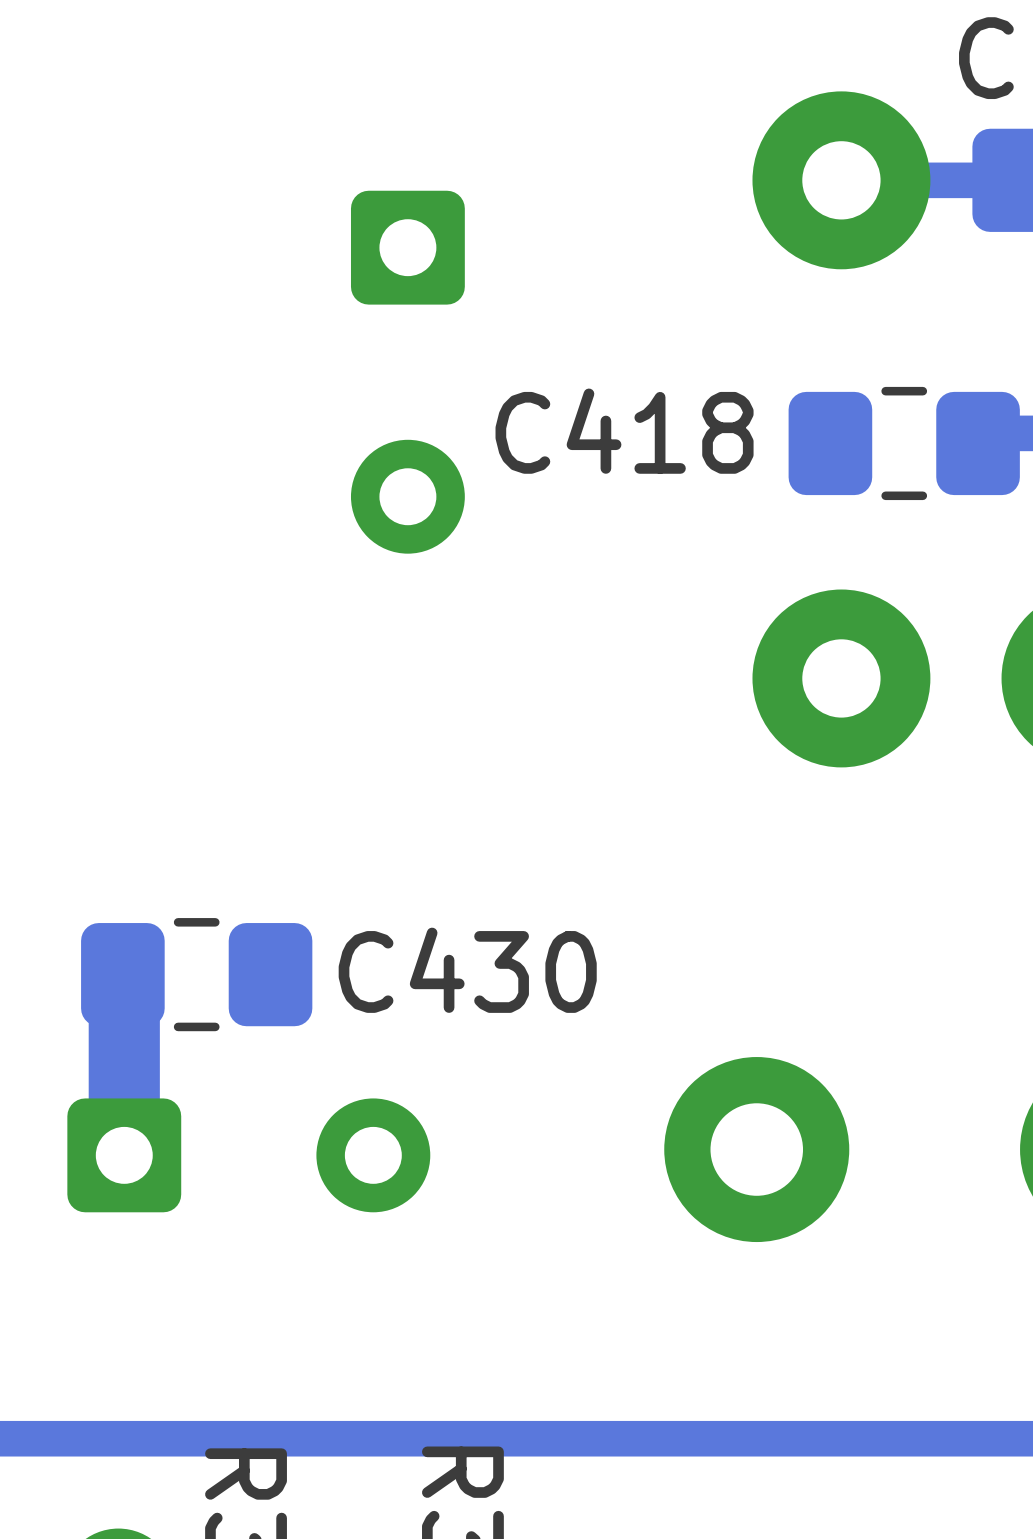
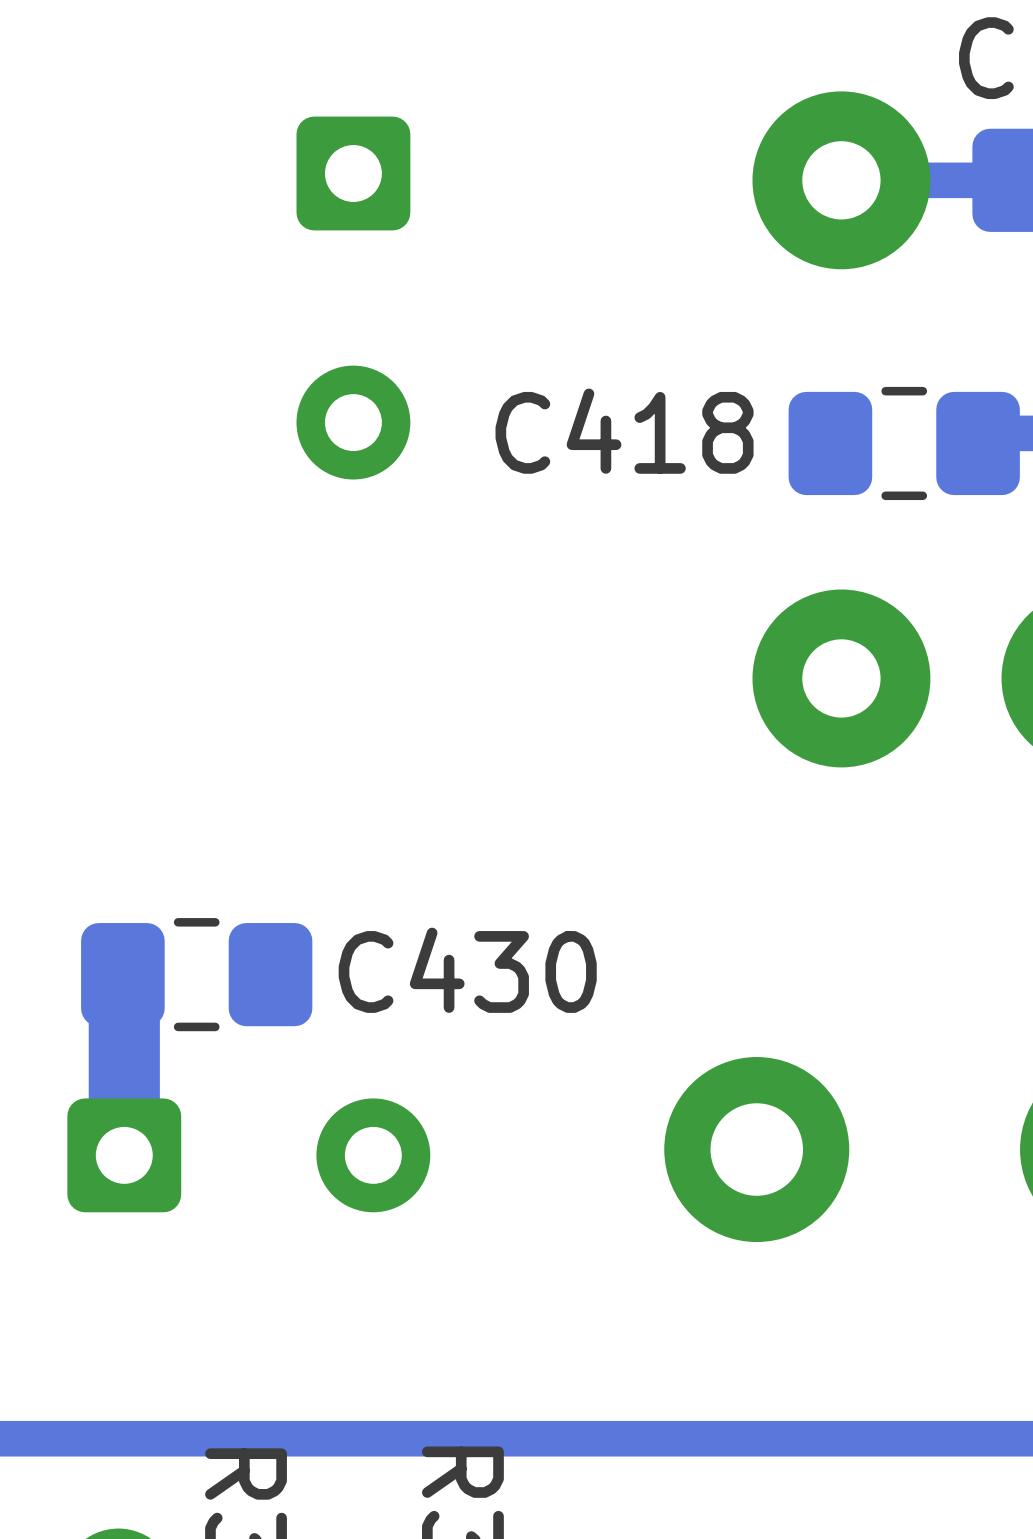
part position: (407, 372) -> (353, 298)

